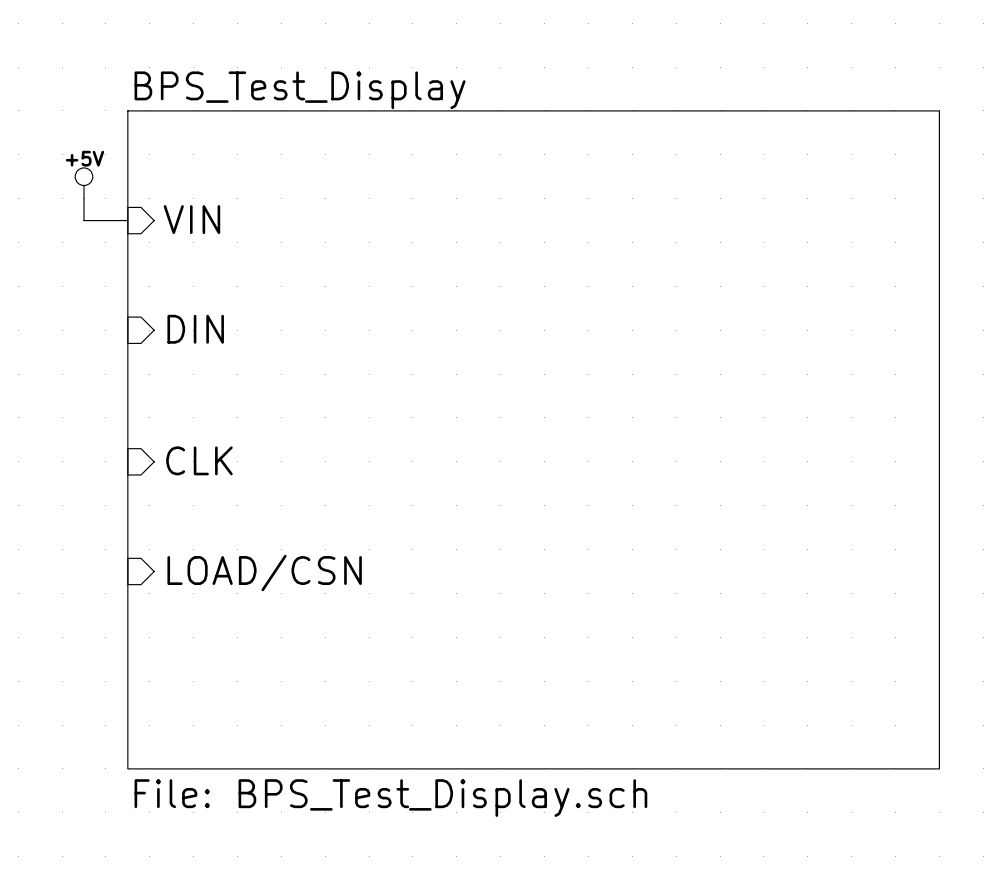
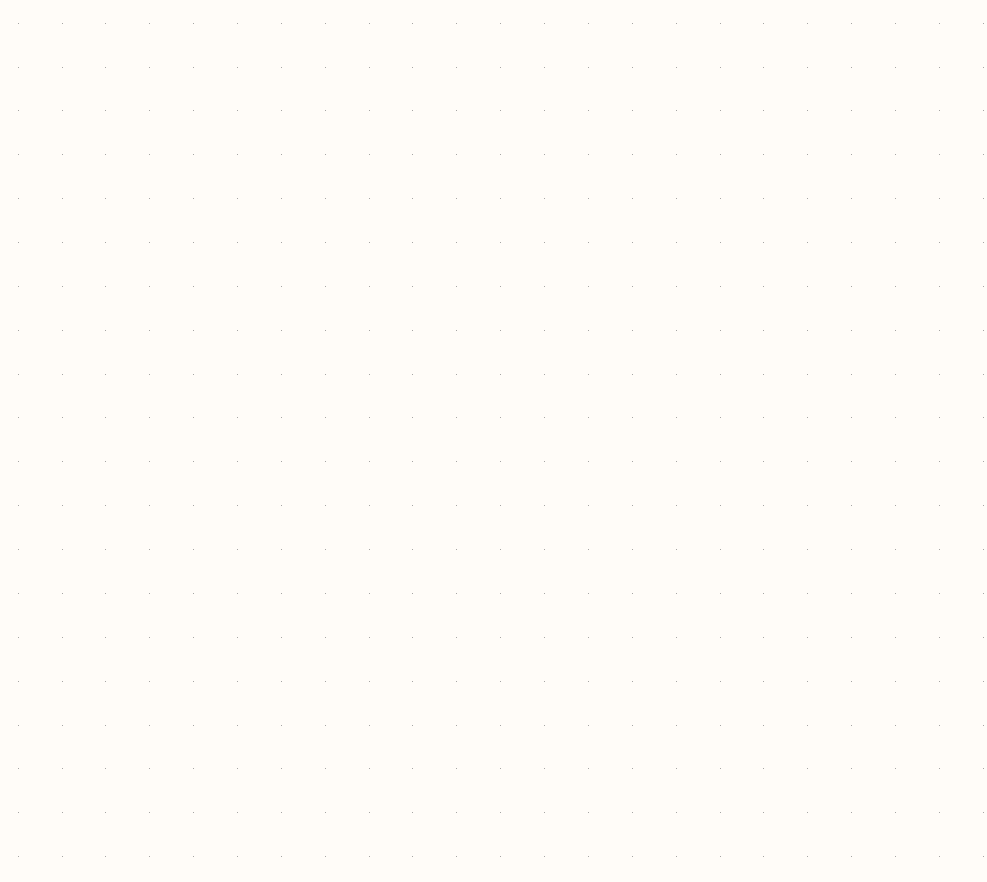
power symbol: +5V (83, 183) -> none
wire: (83, 198) (83, 220) (127, 220) -> none
sheet pin: VIN (191, 219) -> none
sheet pin: DIN (195, 329) -> none
sheet BPS_Test_Display: File: BPS_Test_Display.sch (533, 439) -> none
sheet pin: CLK (199, 460) -> none
sheet pin: LOAD/CSN (264, 573) -> none

